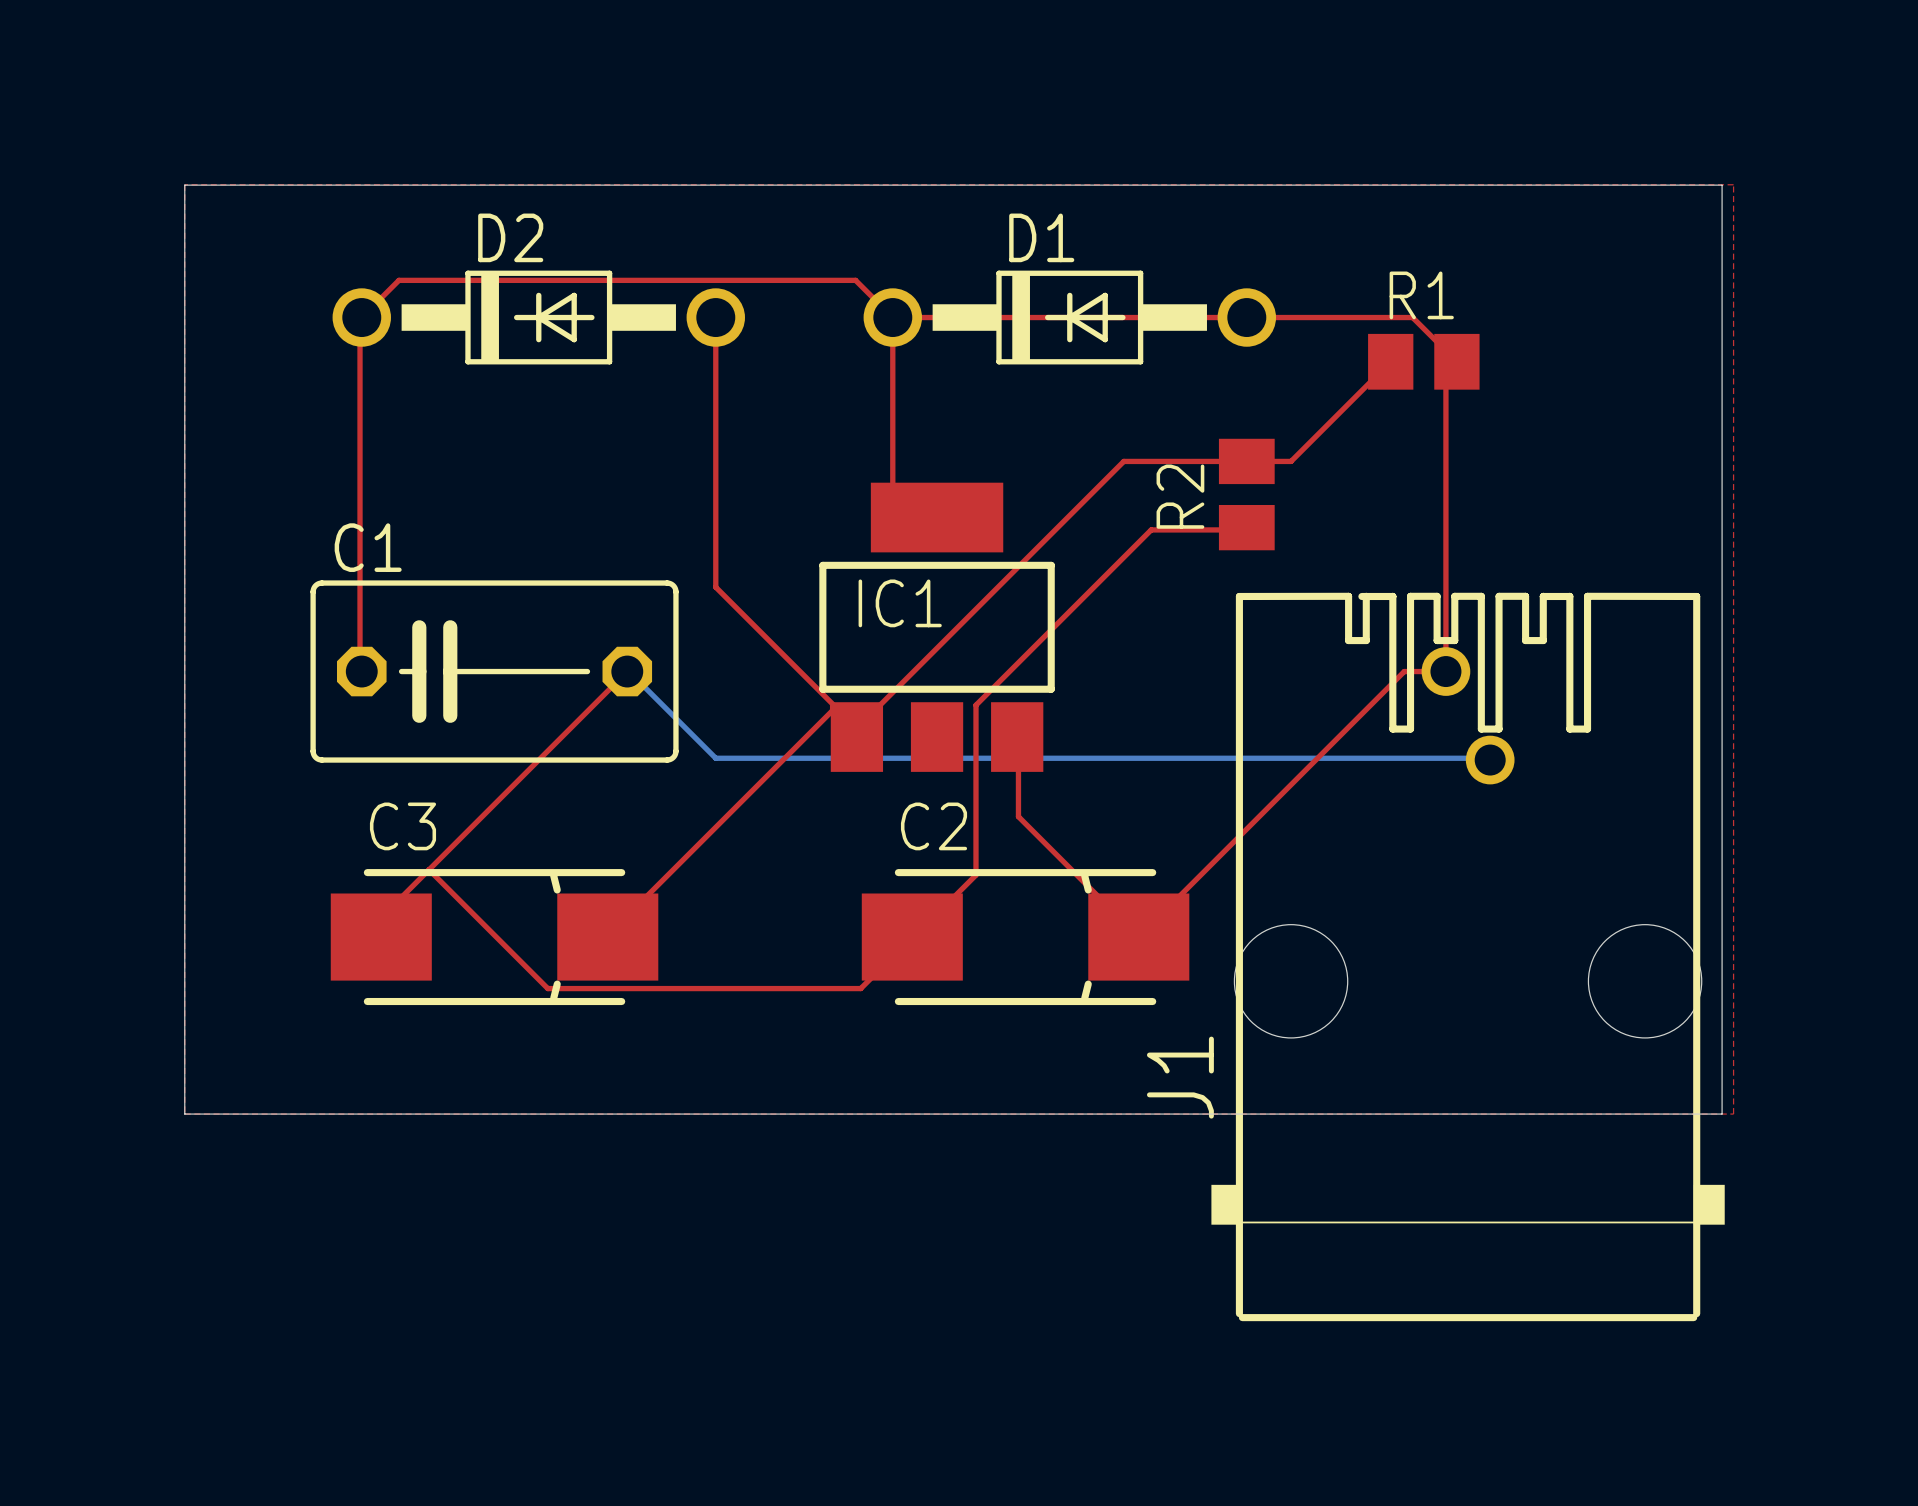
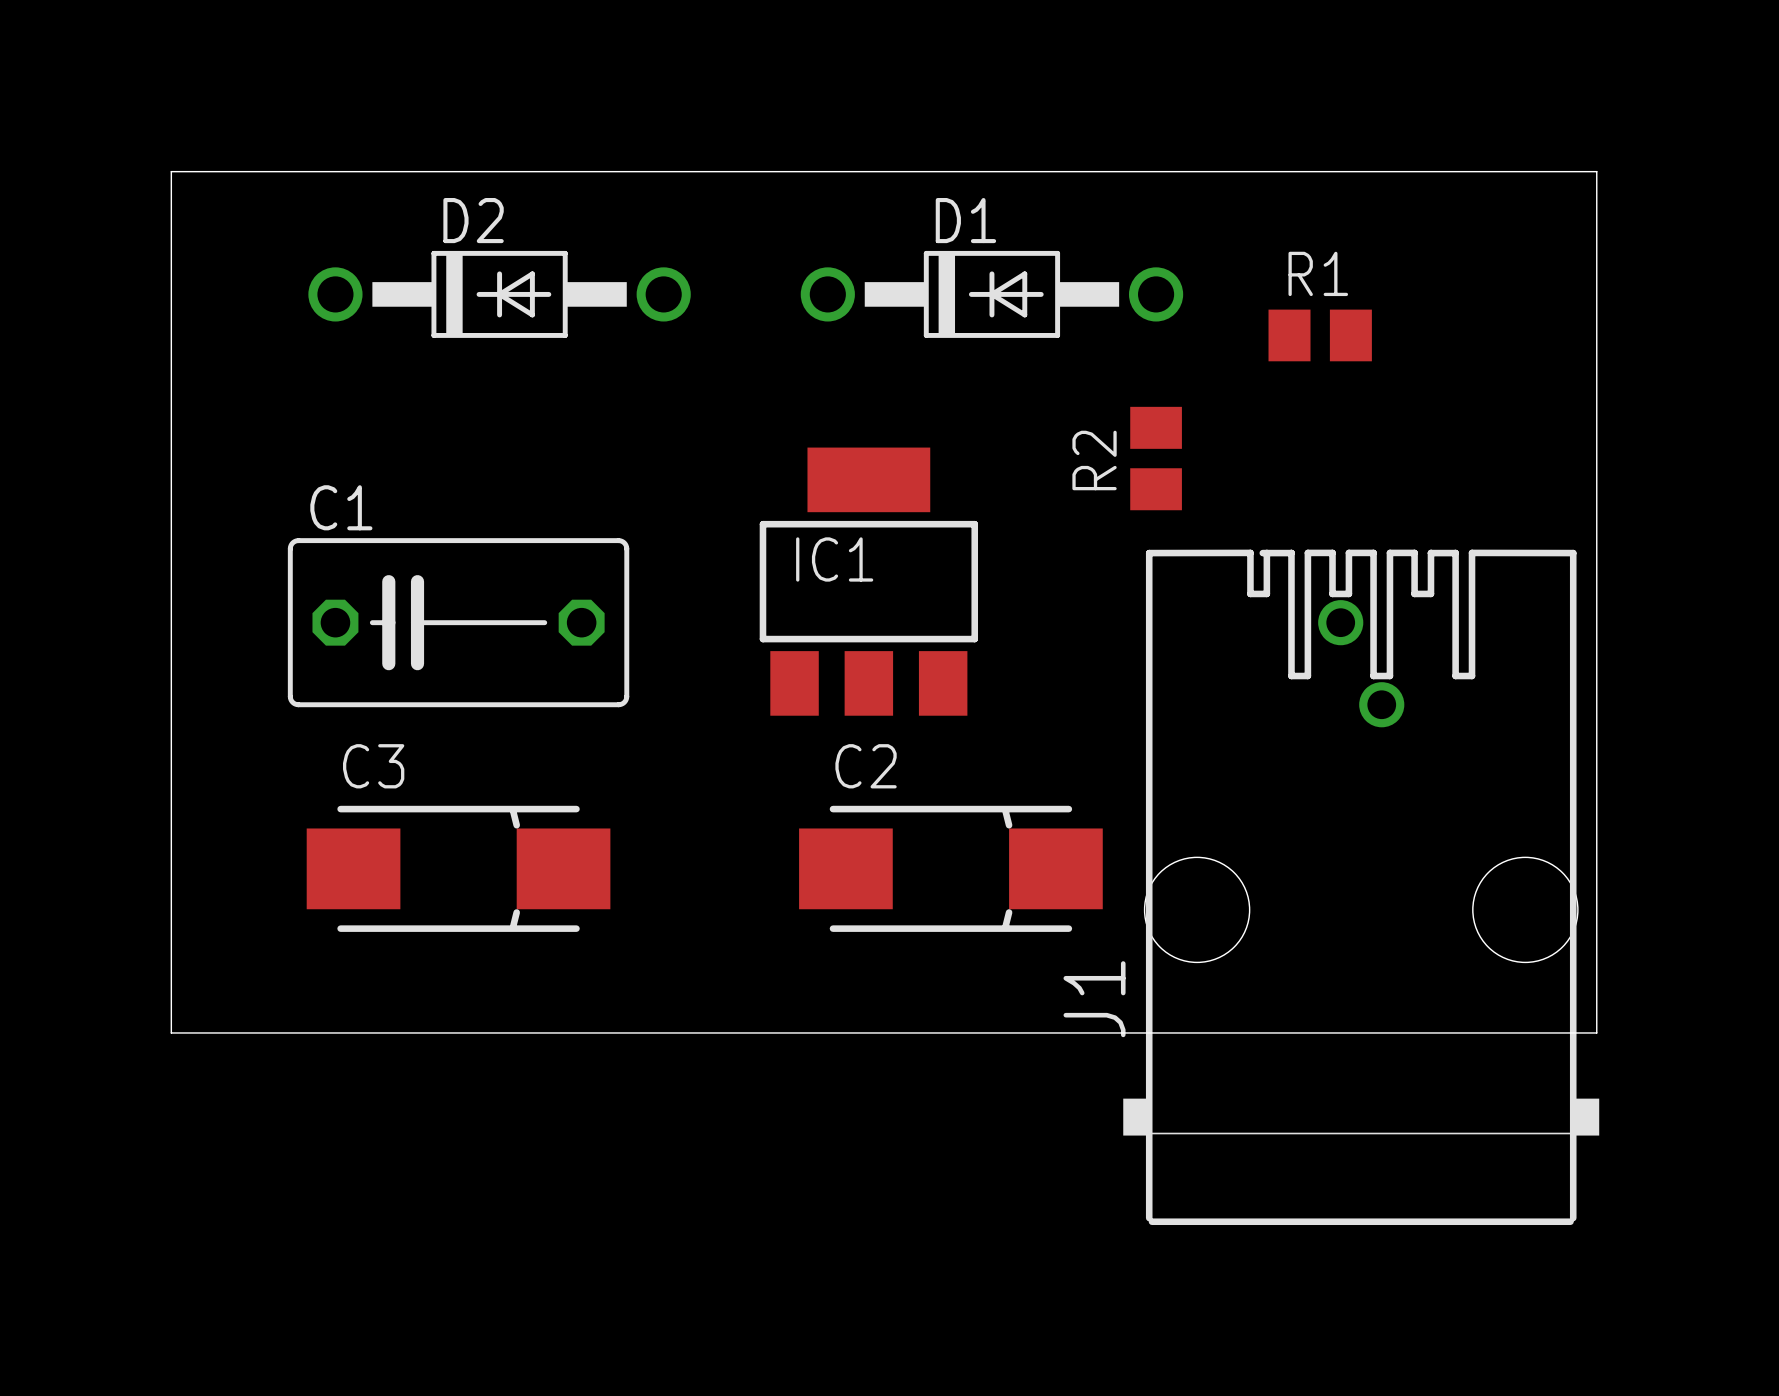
top zone outline: (184, 184) (184, 1114) (1733, 1114) (1733, 184) (184, 184) -> none
top track: (715, 317) (715, 587) (856, 728) -> none
top track: (892, 317) (892, 504) (905, 517) (937, 517) -> none
top track: (892, 317) (855, 280) (398, 280) (360, 317) (360, 668) (361, 671) -> none
top track: (892, 317) (1412, 317) (1456, 361) (1445, 372) (1445, 671) (1404, 671) (1138, 937) (1018, 816) (1017, 737) -> none
top track: (1390, 361) (1291, 461) (1123, 461) (856, 728) -> none
top track: (1246, 527) (1246, 529) (1151, 529) (975, 705) (975, 875) (860, 988) (547, 988) (429, 869) -> none
top track: (627, 671) (386, 912) (386, 933) (381, 937) -> none
bottom track: (627, 671) (715, 758) (1485, 758) (1490, 760) -> none
top track: (856, 728) (856, 737) (832, 705) (832, 710) (607, 937) -> none

